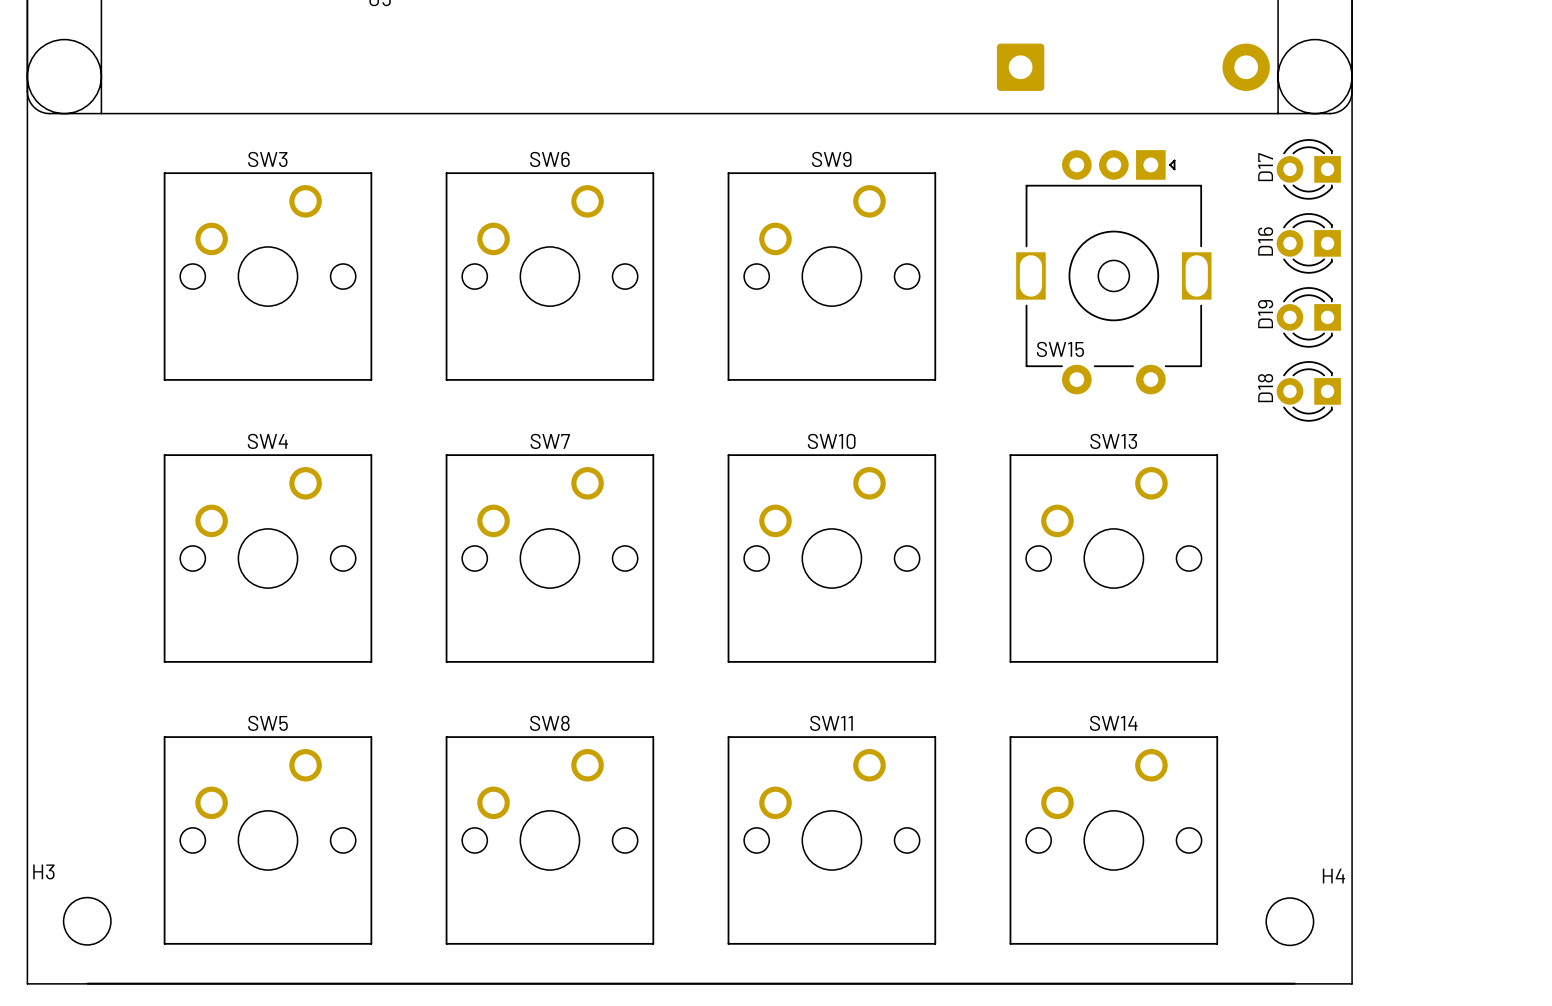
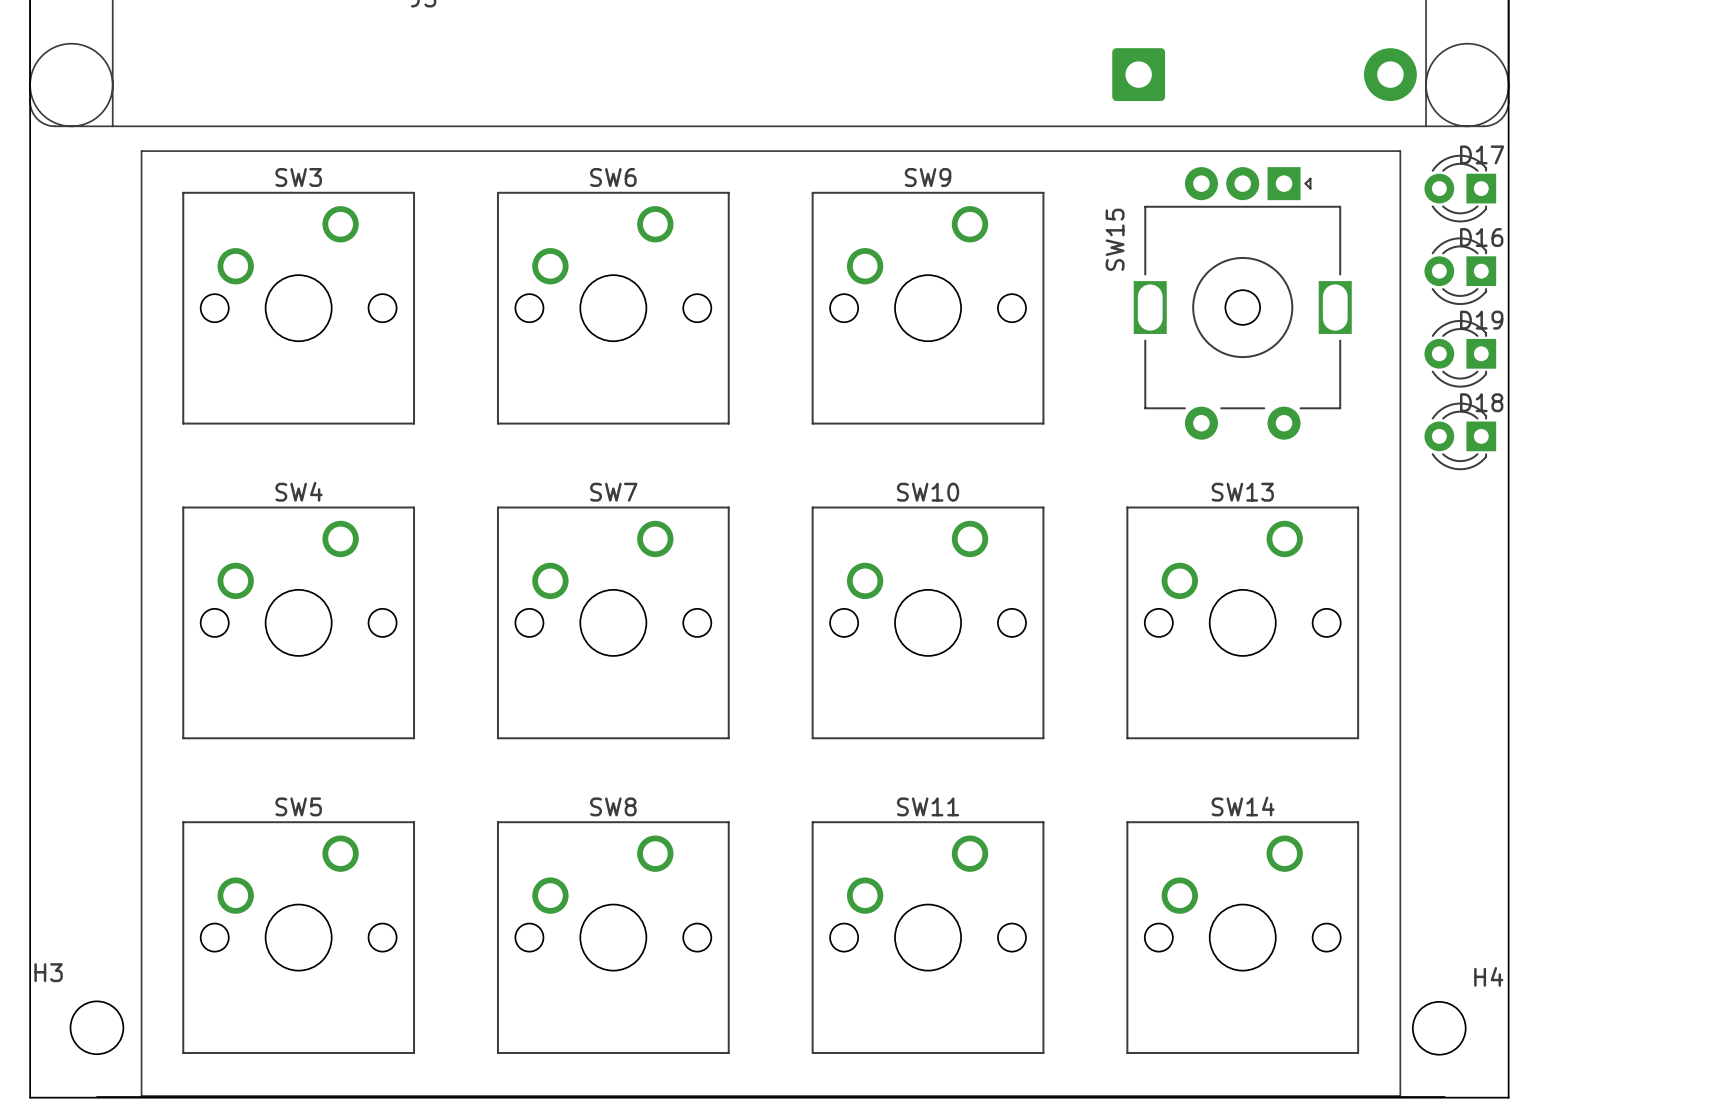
line: none -> (141, 151) (1400, 151) (1400, 1096) (141, 1096) (141, 151)
D17 name rotation: 0° (1265, 167) -> 90° clockwise (1482, 154)
D17 name position: D17 (1265, 167) -> D17 (1482, 154)
D16 name rotation: 0° (1265, 241) -> 90° clockwise (1481, 237)
D16 name position: D16 (1265, 241) -> D16 (1481, 237)
D19 name rotation: 0° (1265, 314) -> 90° clockwise (1481, 320)
D19 name position: D19 (1265, 314) -> D19 (1481, 320)
SW15 name rotation: 0° (1060, 349) -> 90° counterclockwise (1115, 239)
SW15 name position: SW15 (1060, 349) -> SW15 (1115, 239)
D18 name rotation: 0° (1265, 388) -> 90° clockwise (1481, 402)
D18 name position: D18 (1265, 388) -> D18 (1481, 402)

